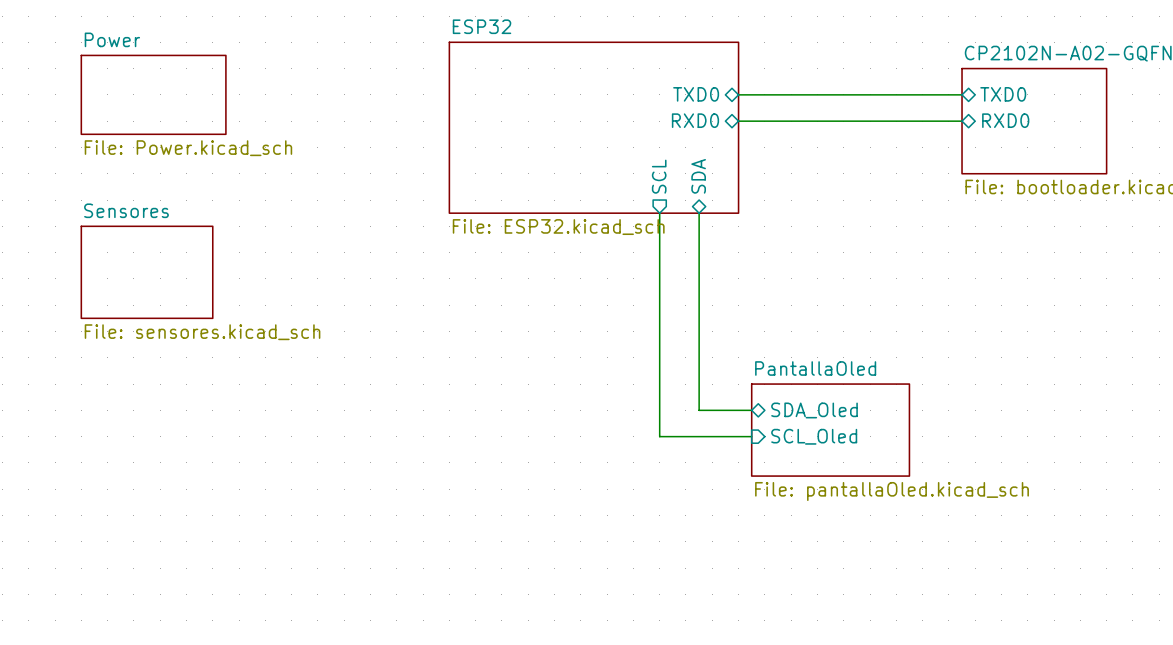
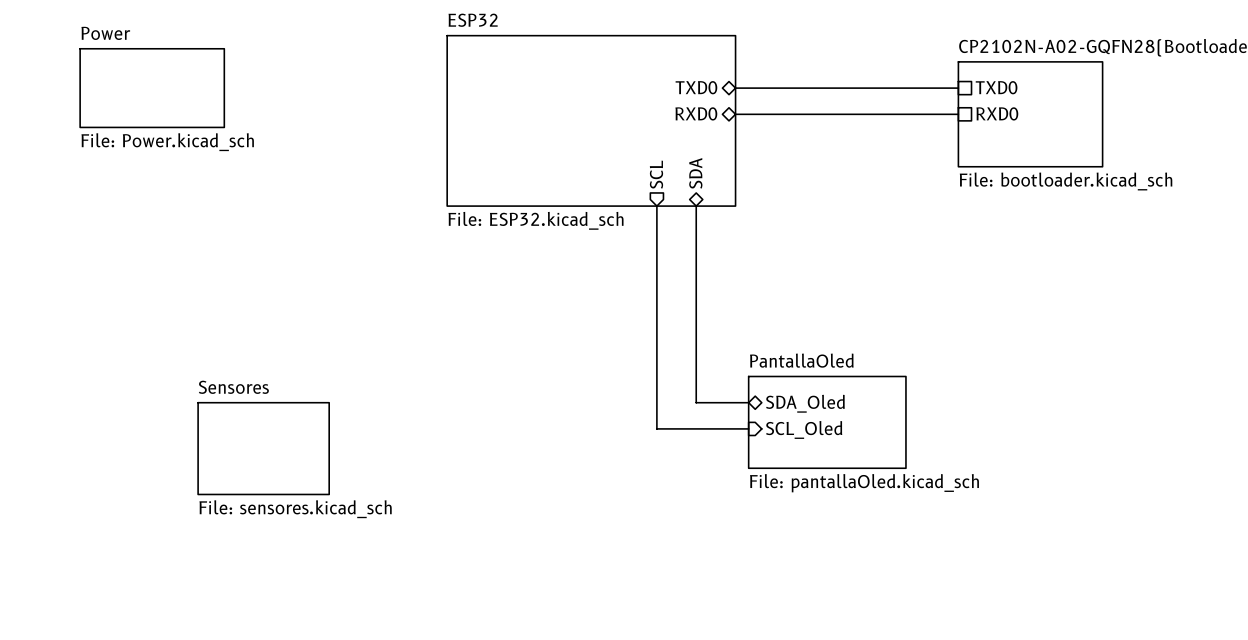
sheet pin shape: bidirectional (1003, 94) -> passive (996, 87)
sheet pin shape: bidirectional (1005, 120) -> passive (997, 113)
sheet Sensores position: (147, 272) -> (263, 448)

